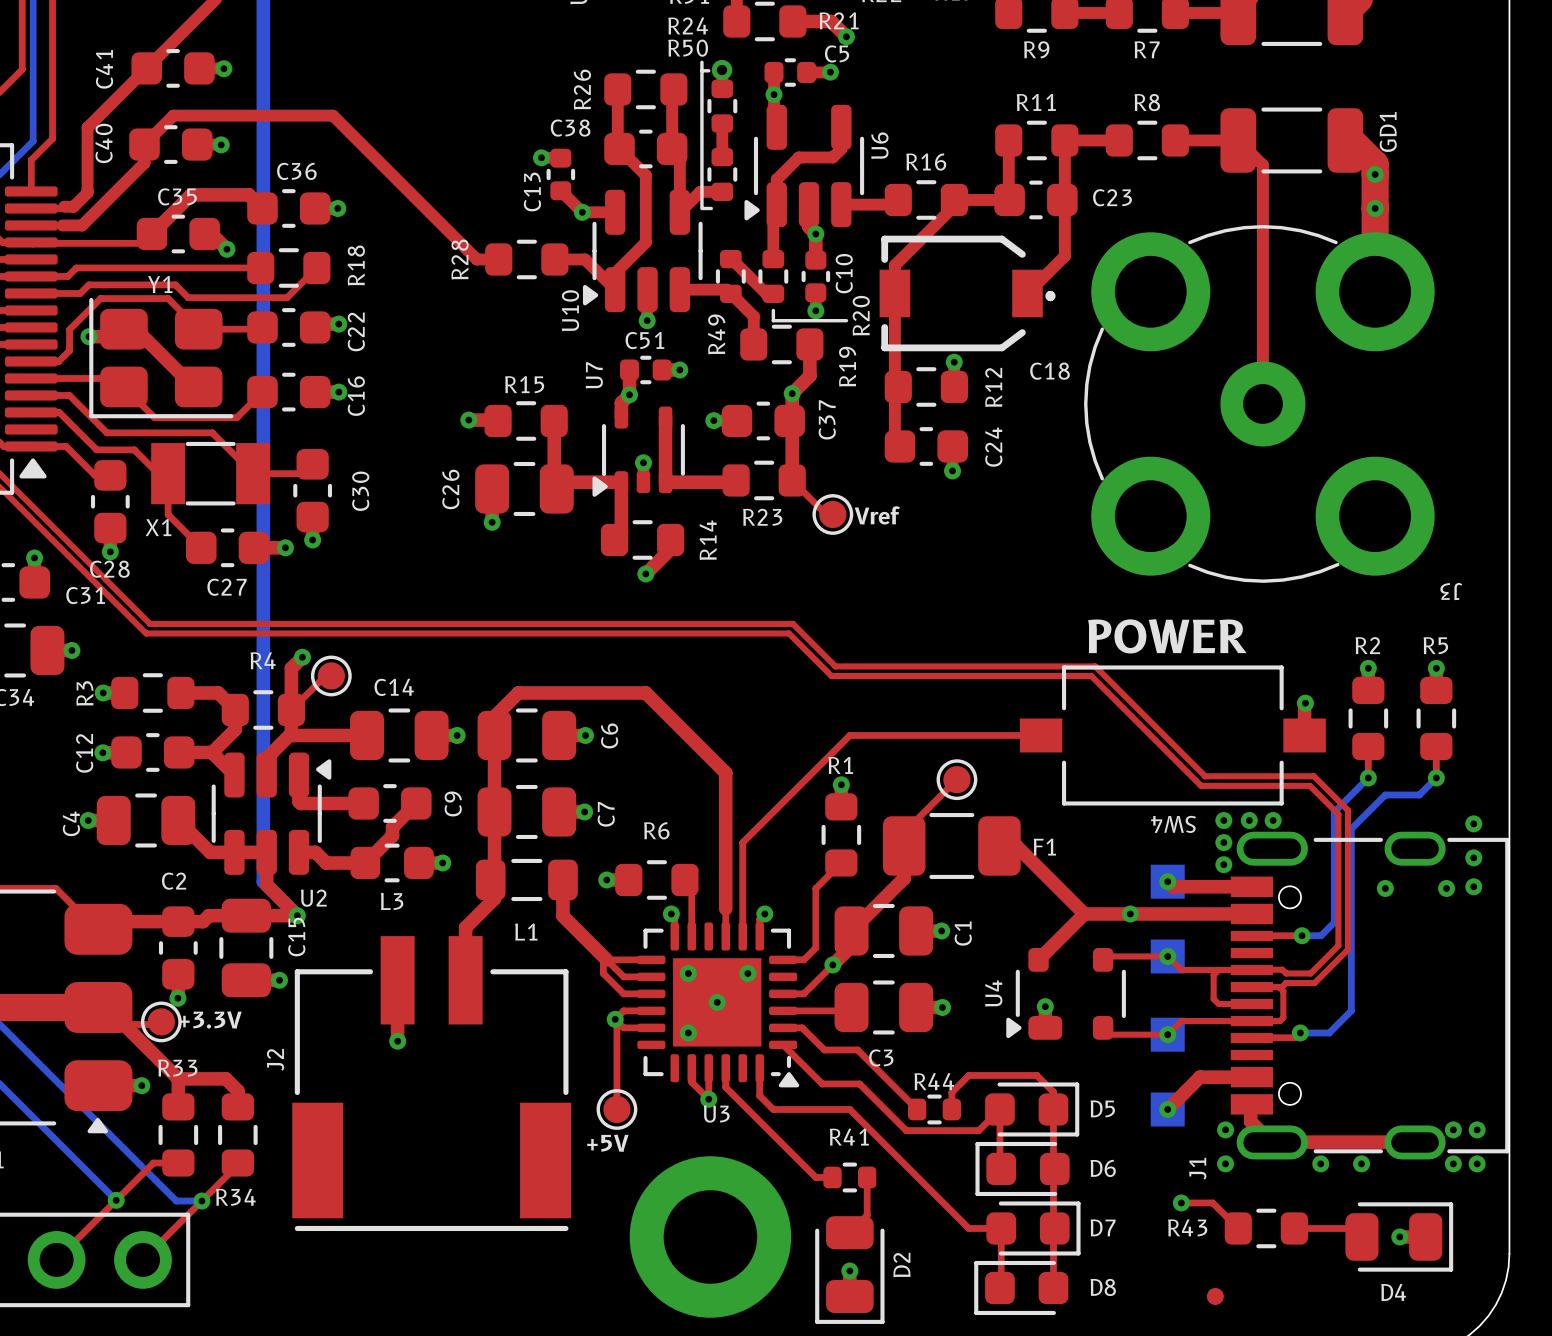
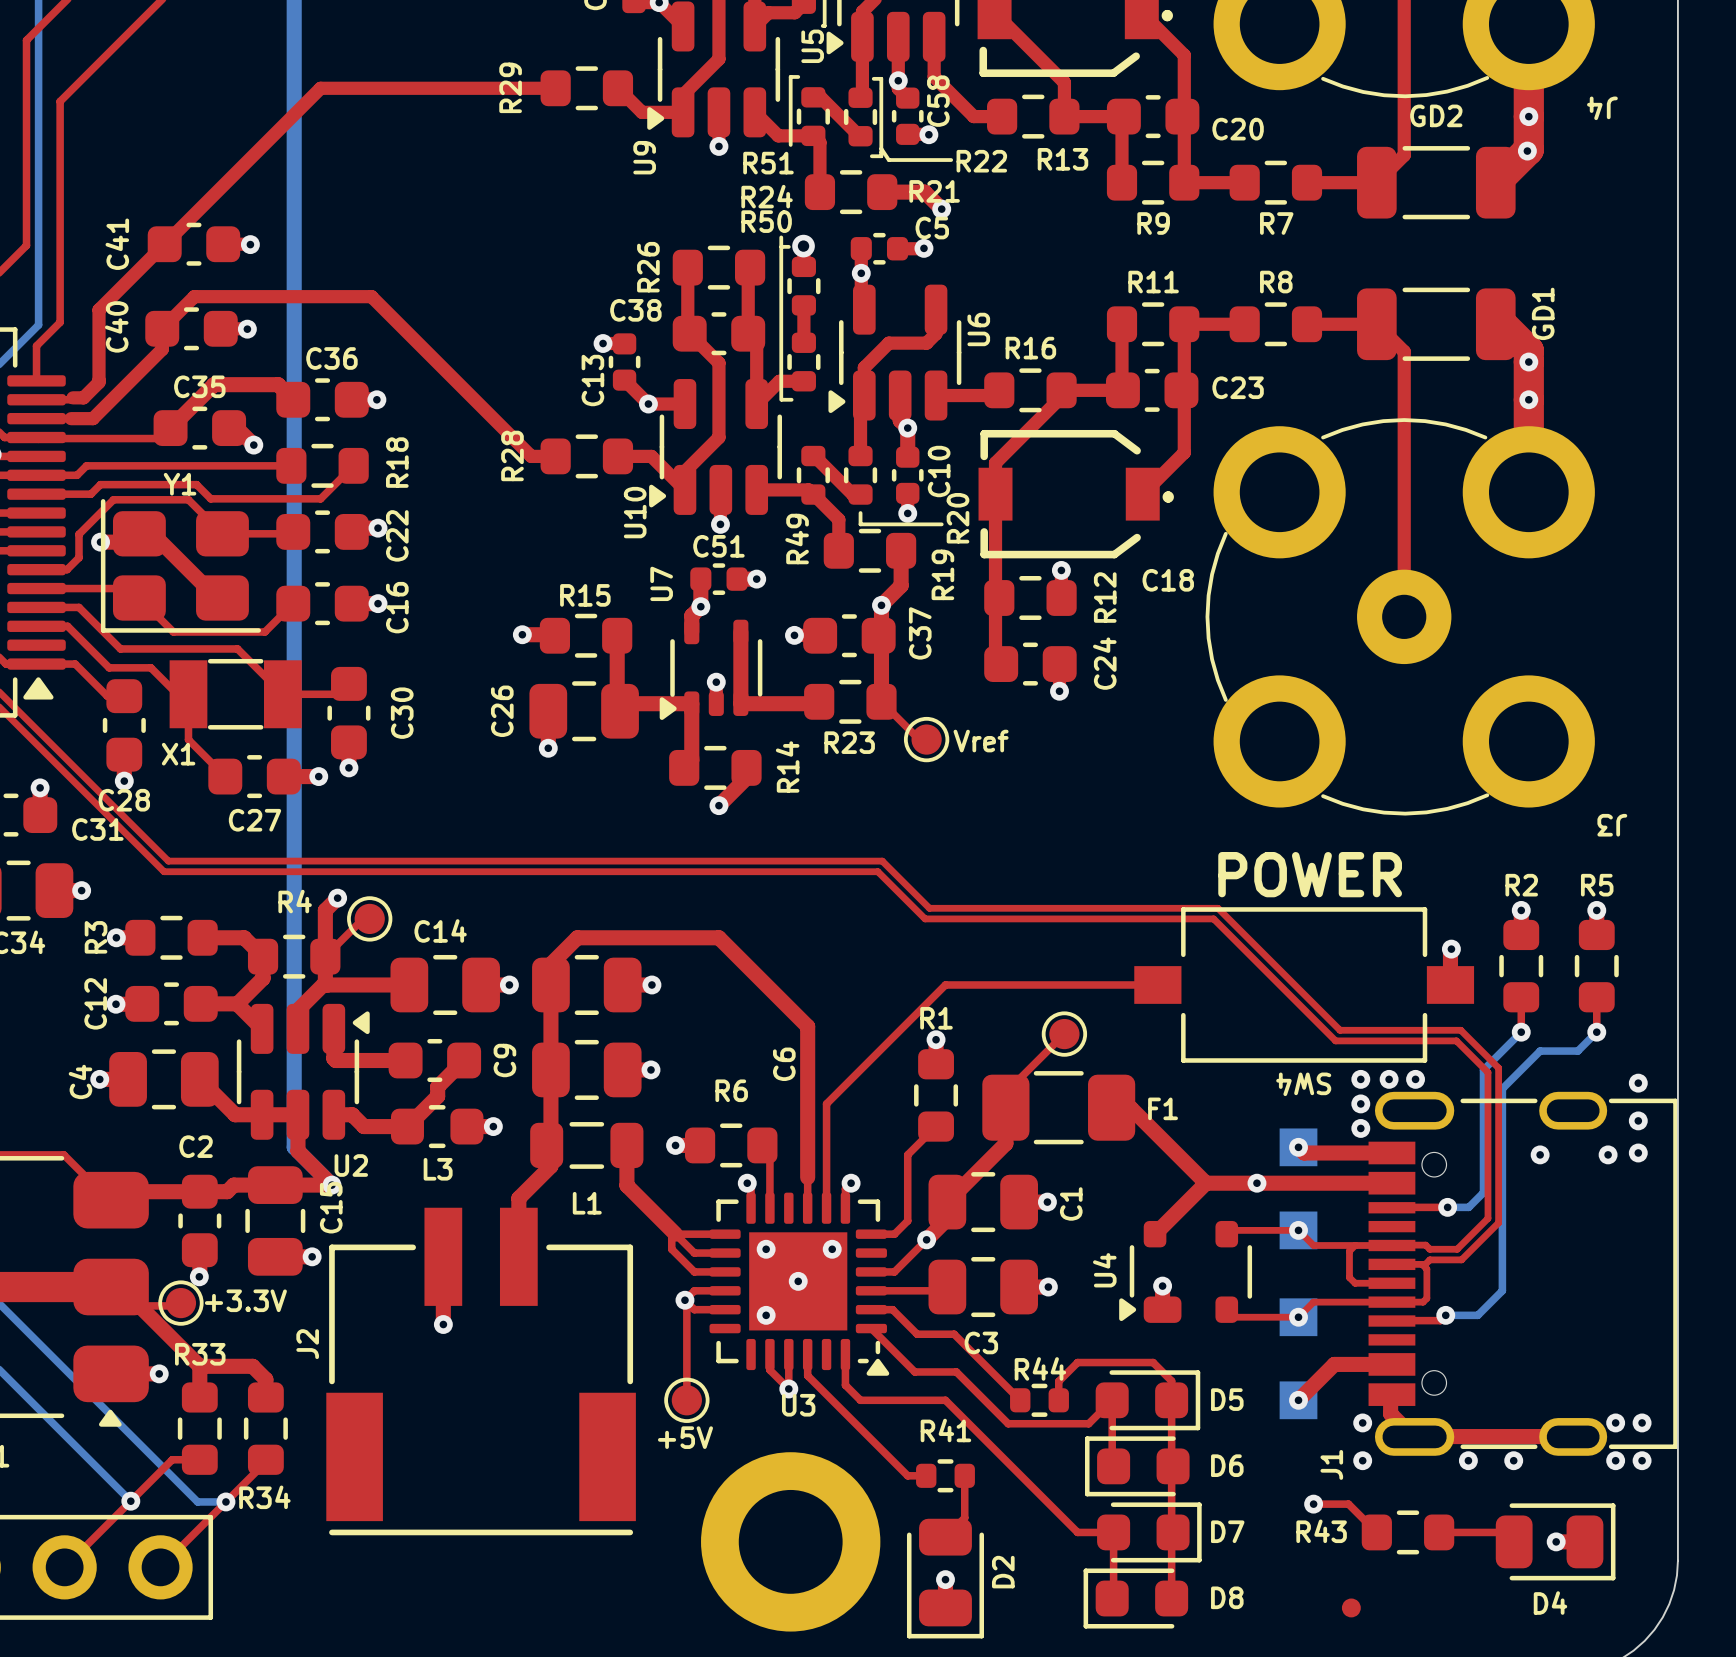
C6 name position: C6 (609, 735) -> C6 (784, 1064)
C7 name: C7 (606, 814) -> none

